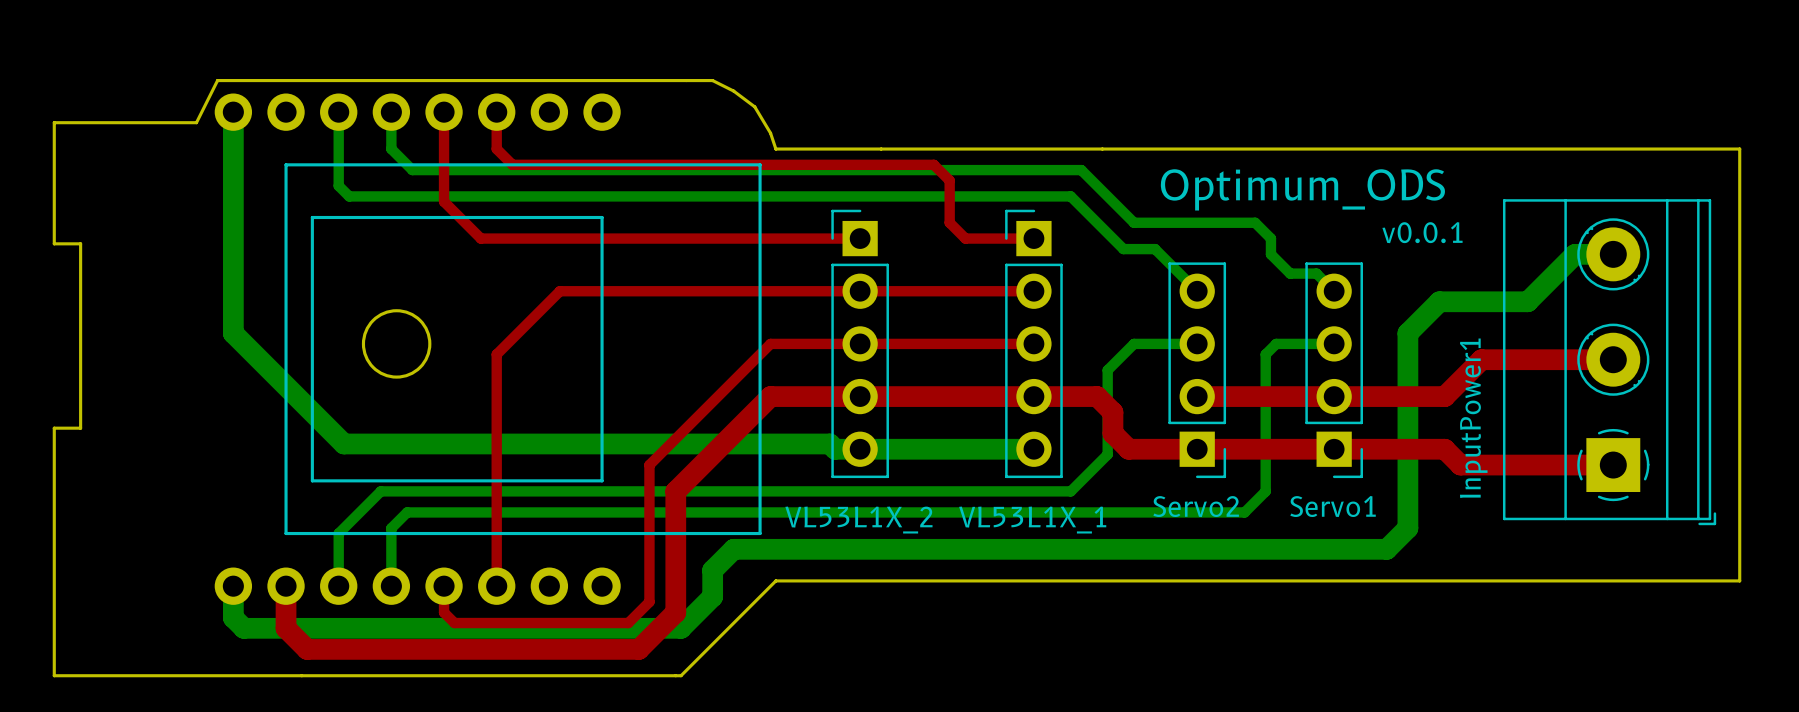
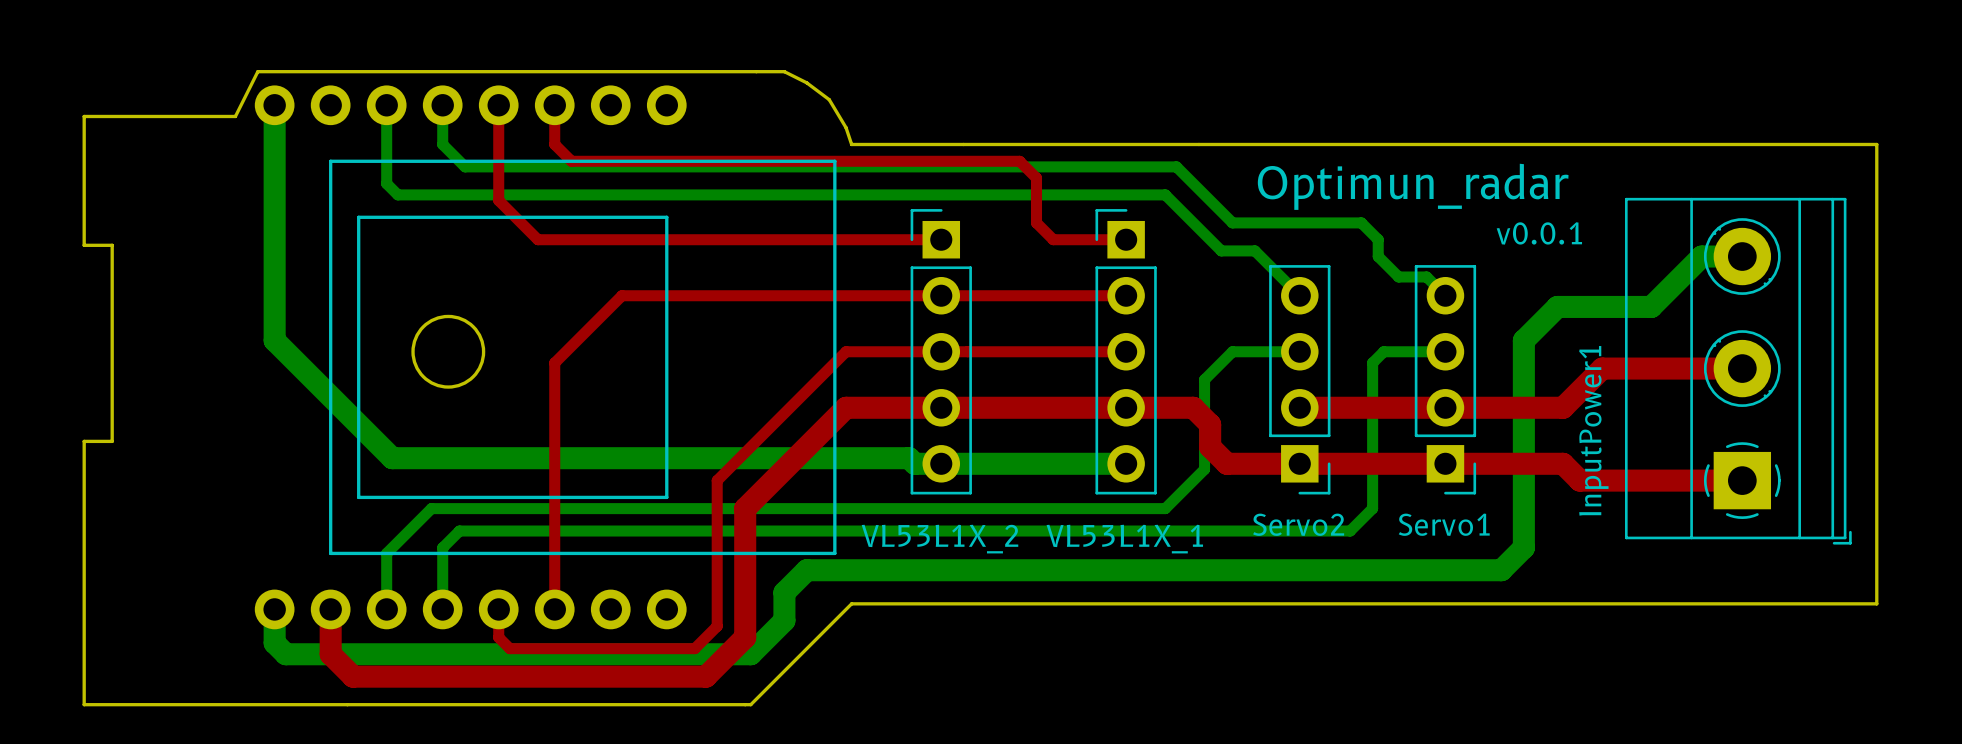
text: Optimum_ODS (1302, 189) -> Optimun_radar (1413, 186)

